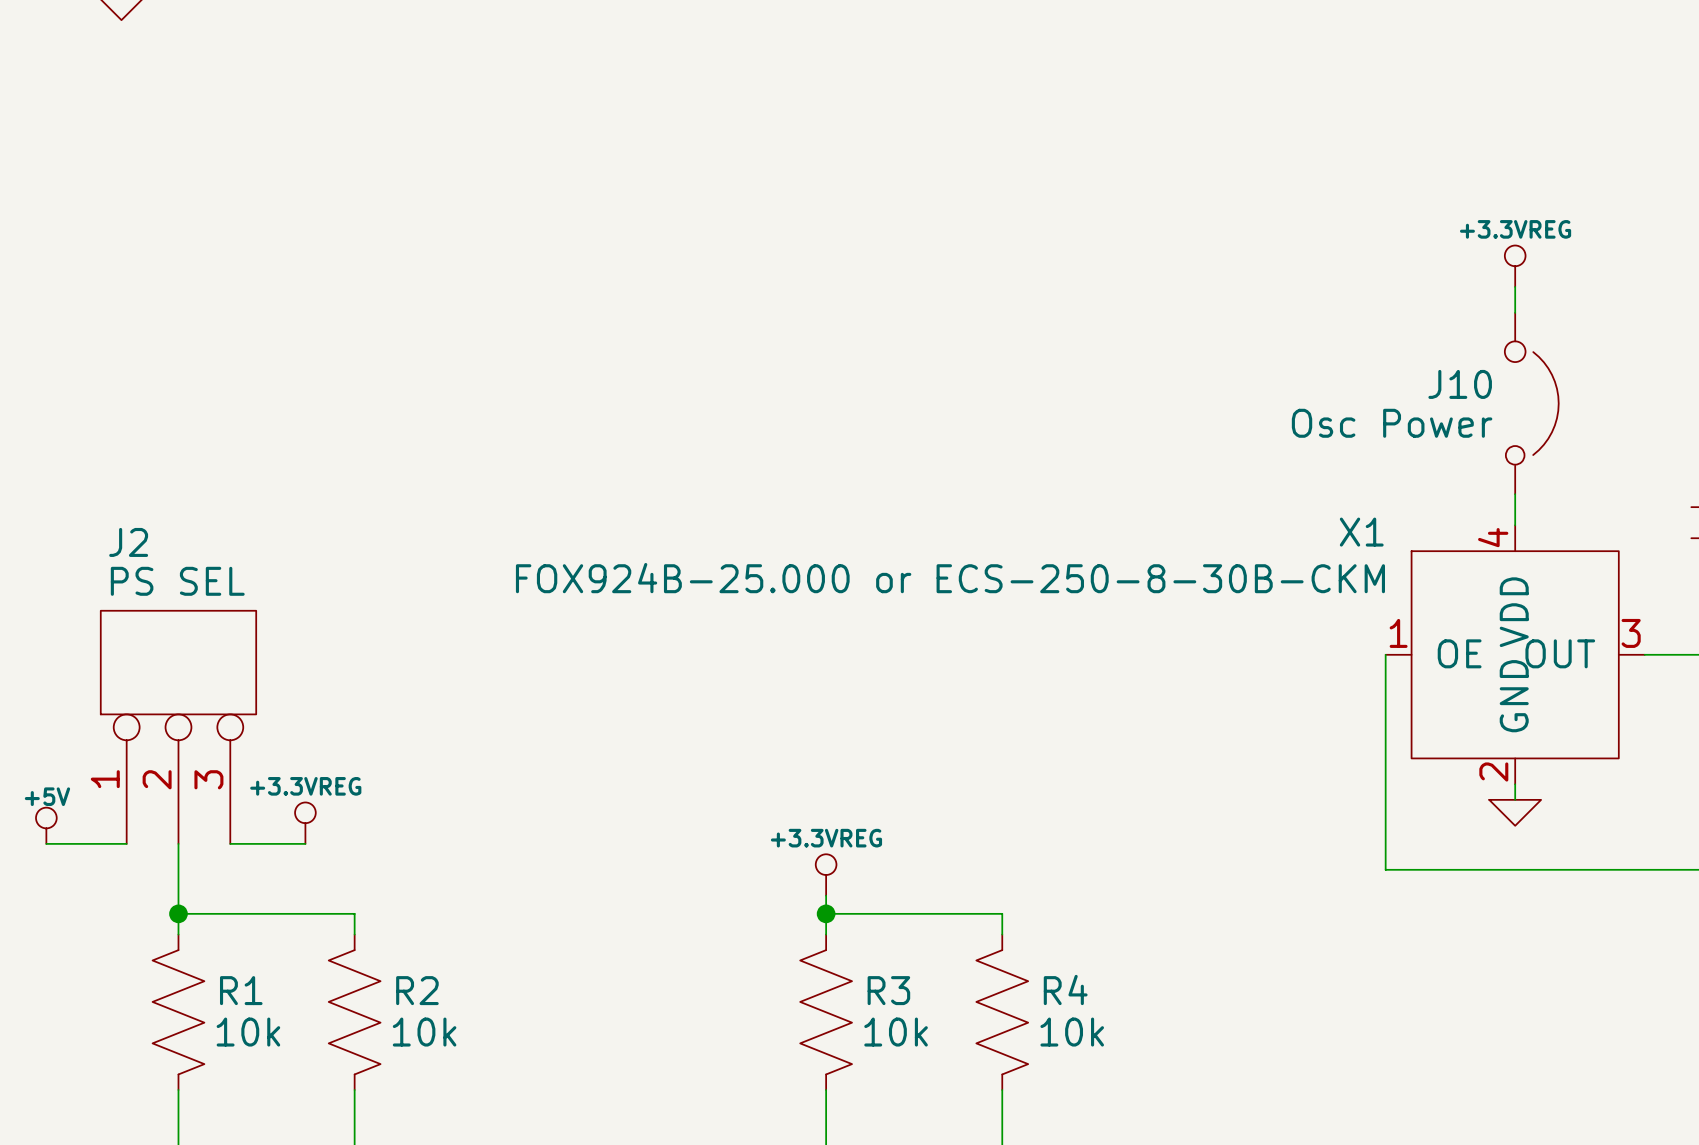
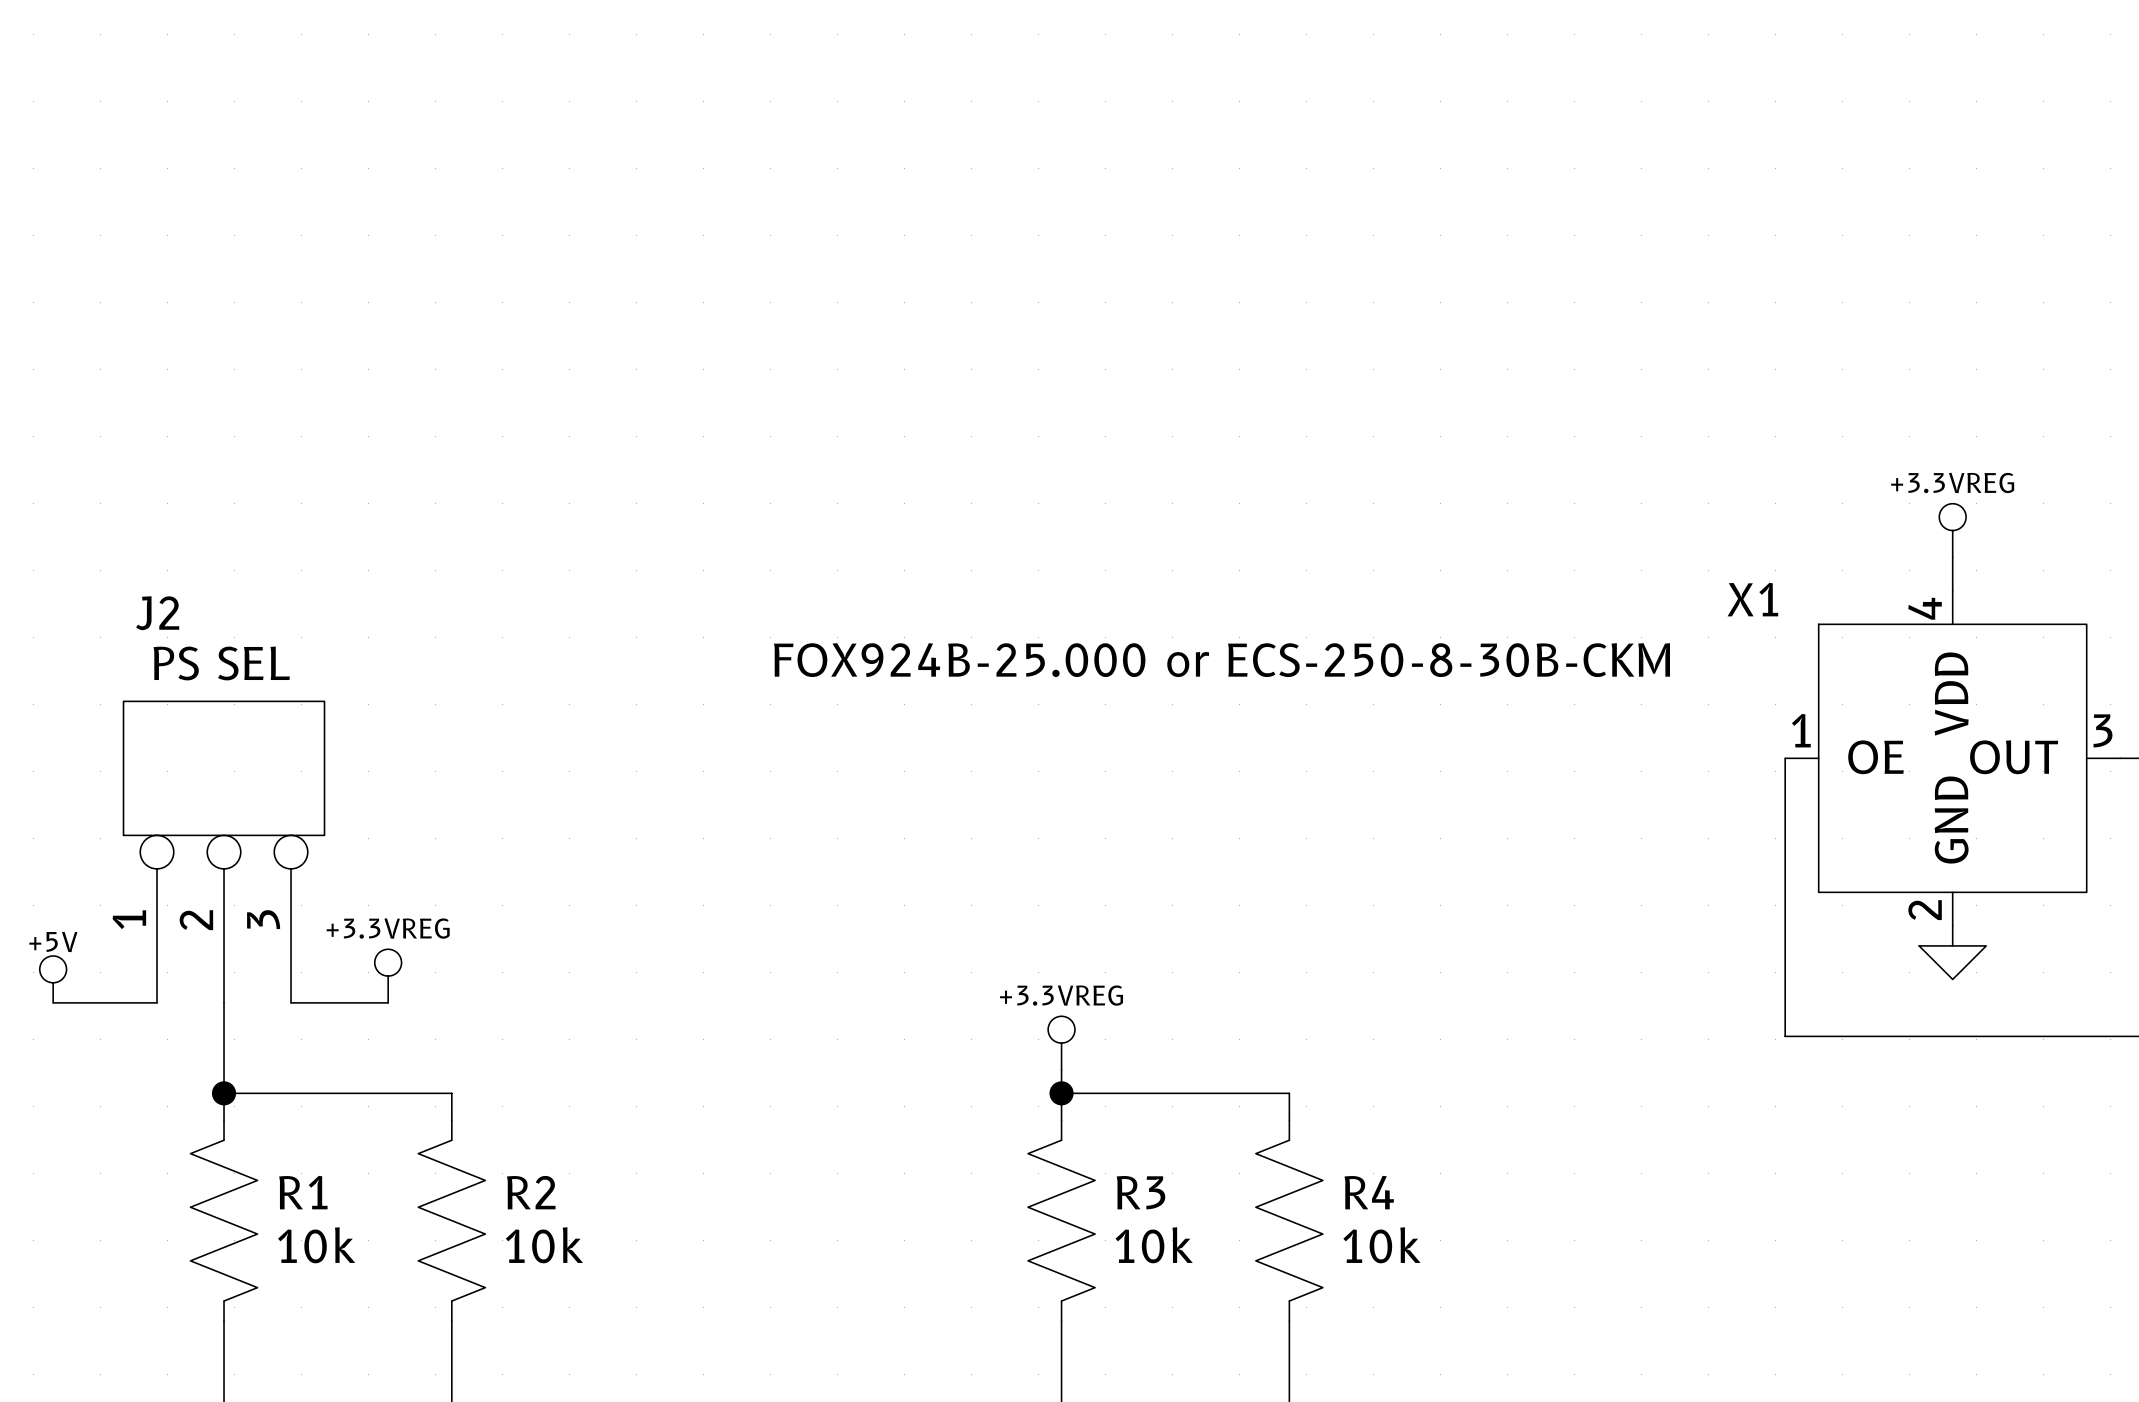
power symbol position: +3.3VREG (1515, 266) -> +3.3VREG (1952, 530)
wire: (1515, 286) (1515, 312) -> none
J10: Osc Power (1531, 403) -> none

